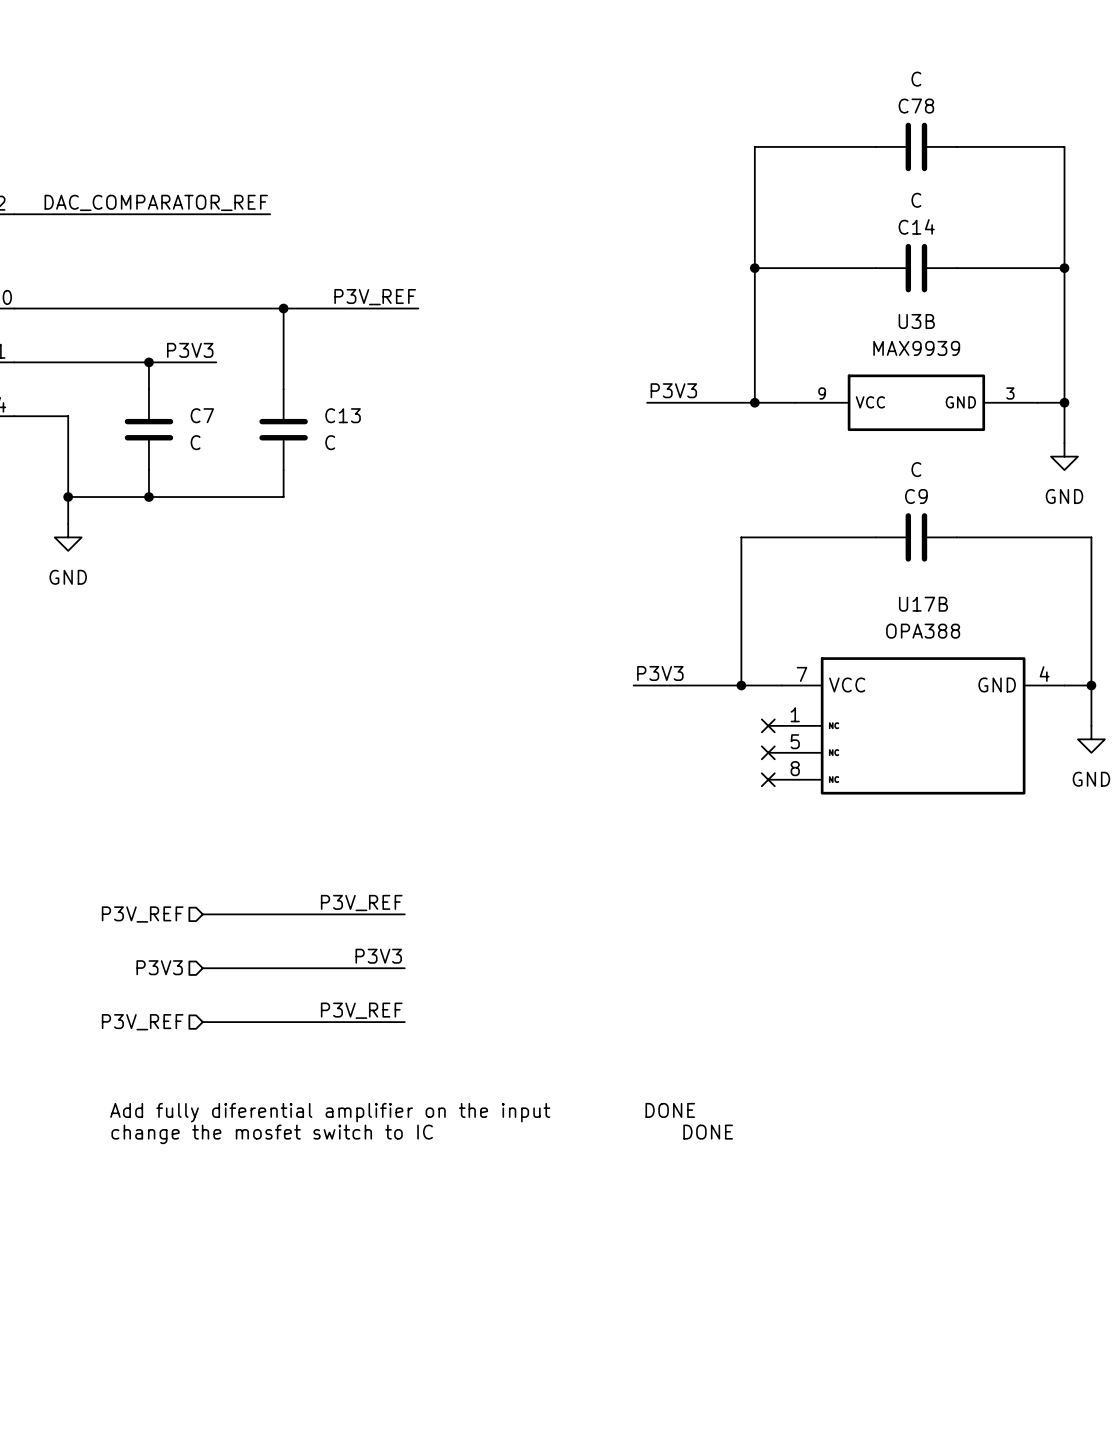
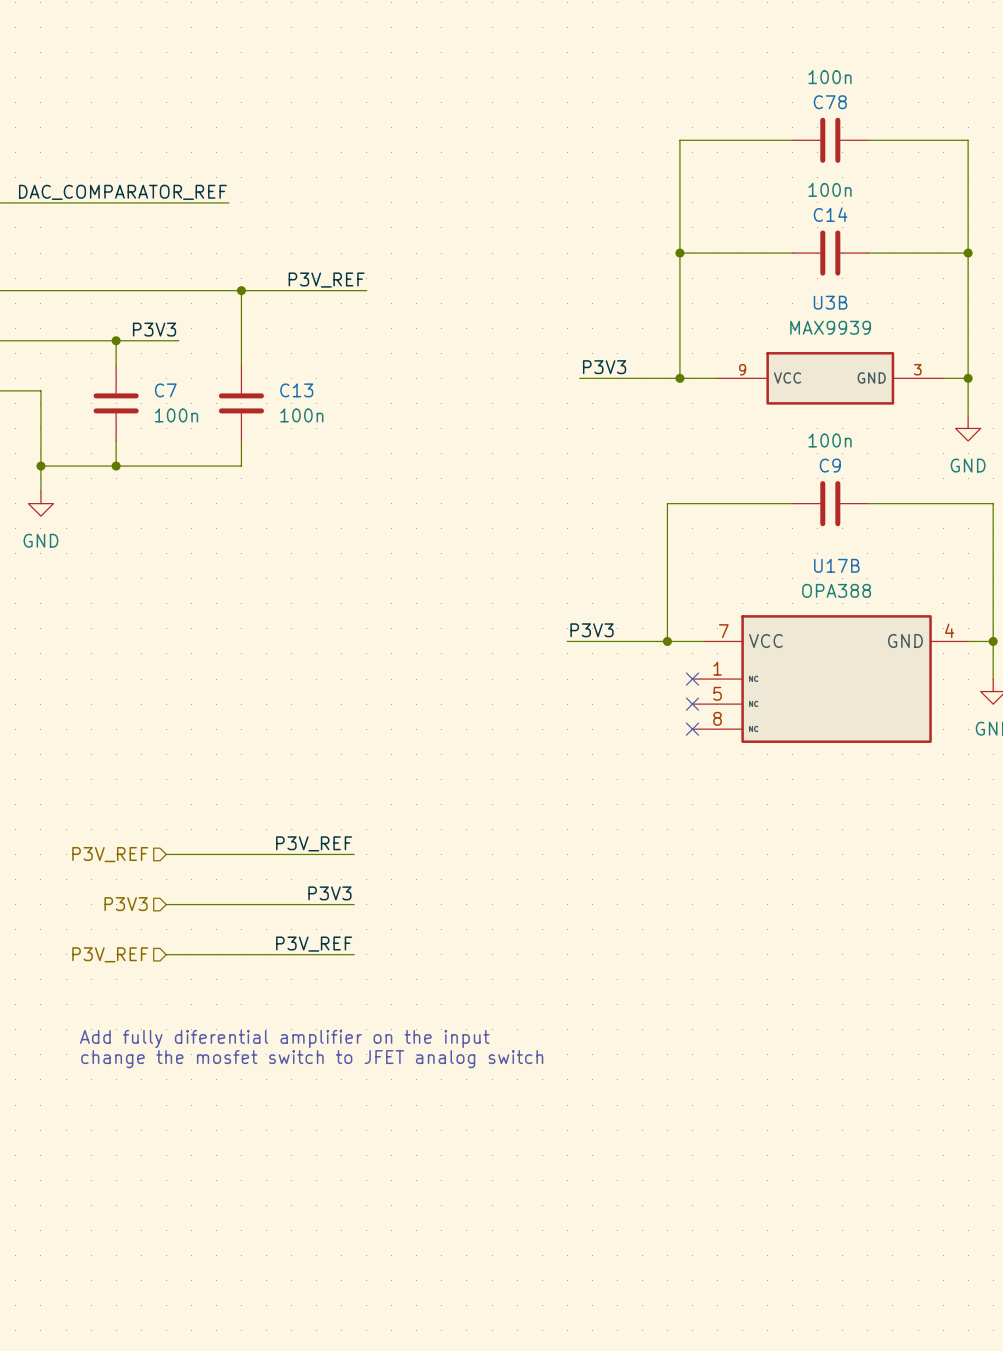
C78 value: C (916, 79) -> 100n (830, 77)
C14 value: C (916, 200) -> 100n (830, 189)
C7 value: C (195, 442) -> 100n (176, 415)
C13 value: C (330, 442) -> 100n (301, 415)
C9 value: C (916, 469) -> 100n (830, 440)
text: Add fully diferential amplifier on the input DONE (402, 1112) -> Add fully diferential amplifier on the input (284, 1038)
text: change the mosfet switch to IC DONE (422, 1134) -> change the mosfet switch to JFET analog switch (312, 1059)

